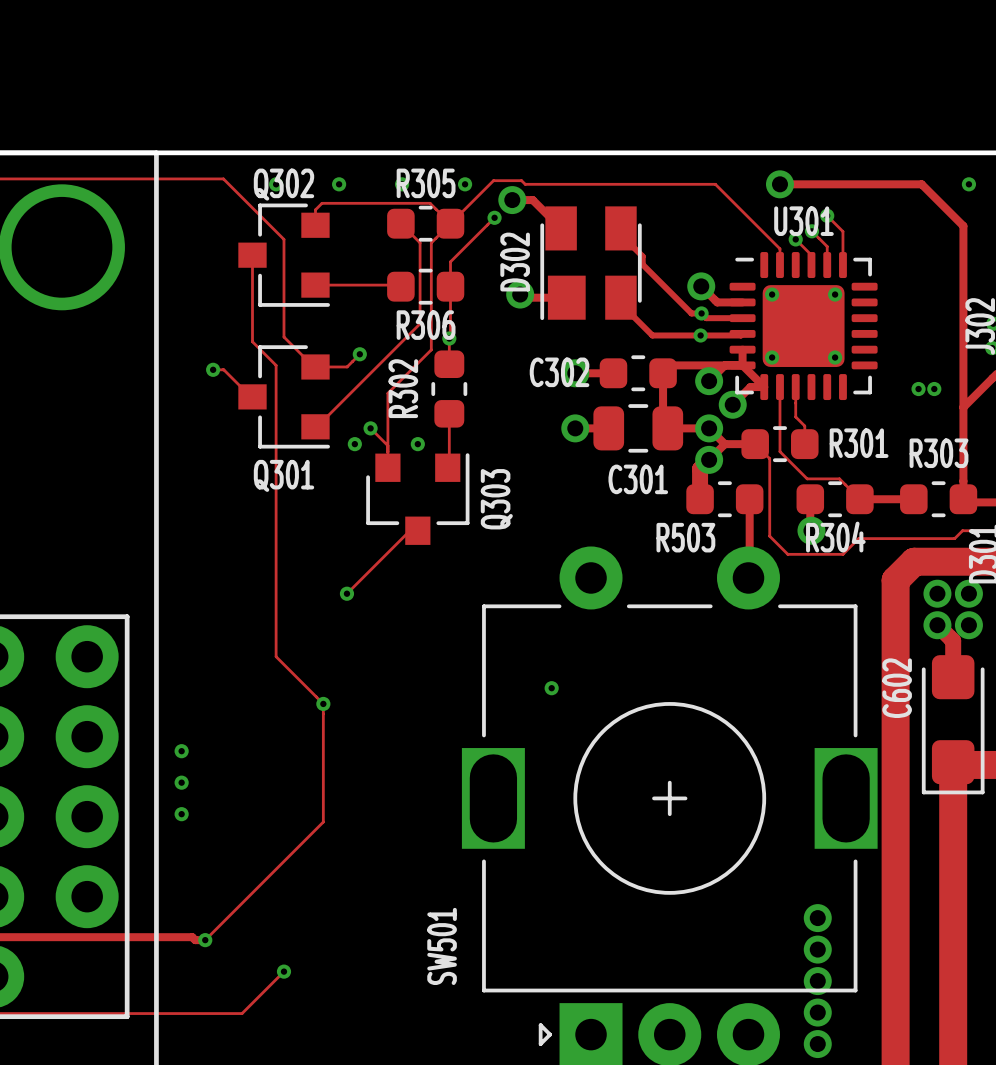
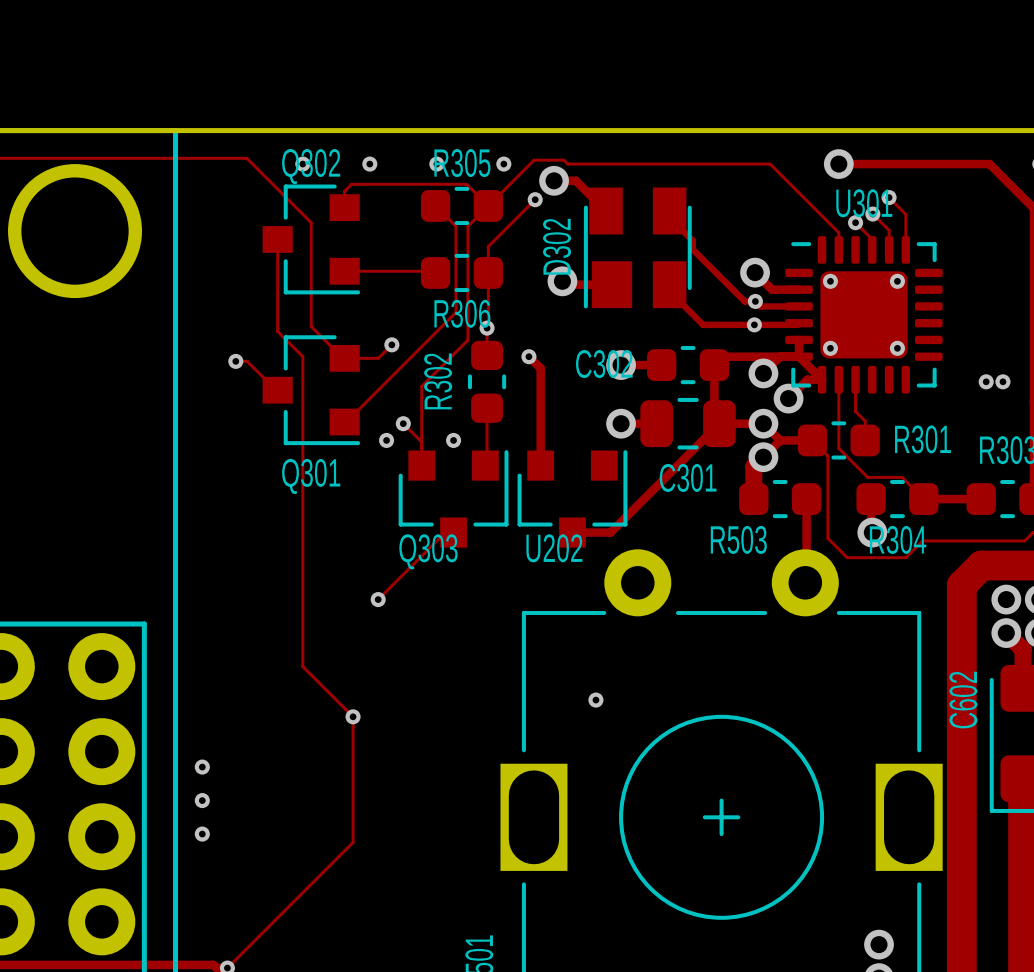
track: none -> (528, 356) (540, 368) (540, 465)
via: none -> (528, 356)
track: none -> (719, 423) (610, 532) (572, 532)
Q303 name rotation: 0° (496, 499) -> 90° clockwise (428, 551)
Q303 name position: Q303 (496, 499) -> Q303 (428, 551)
U202: none -> (572, 498)

